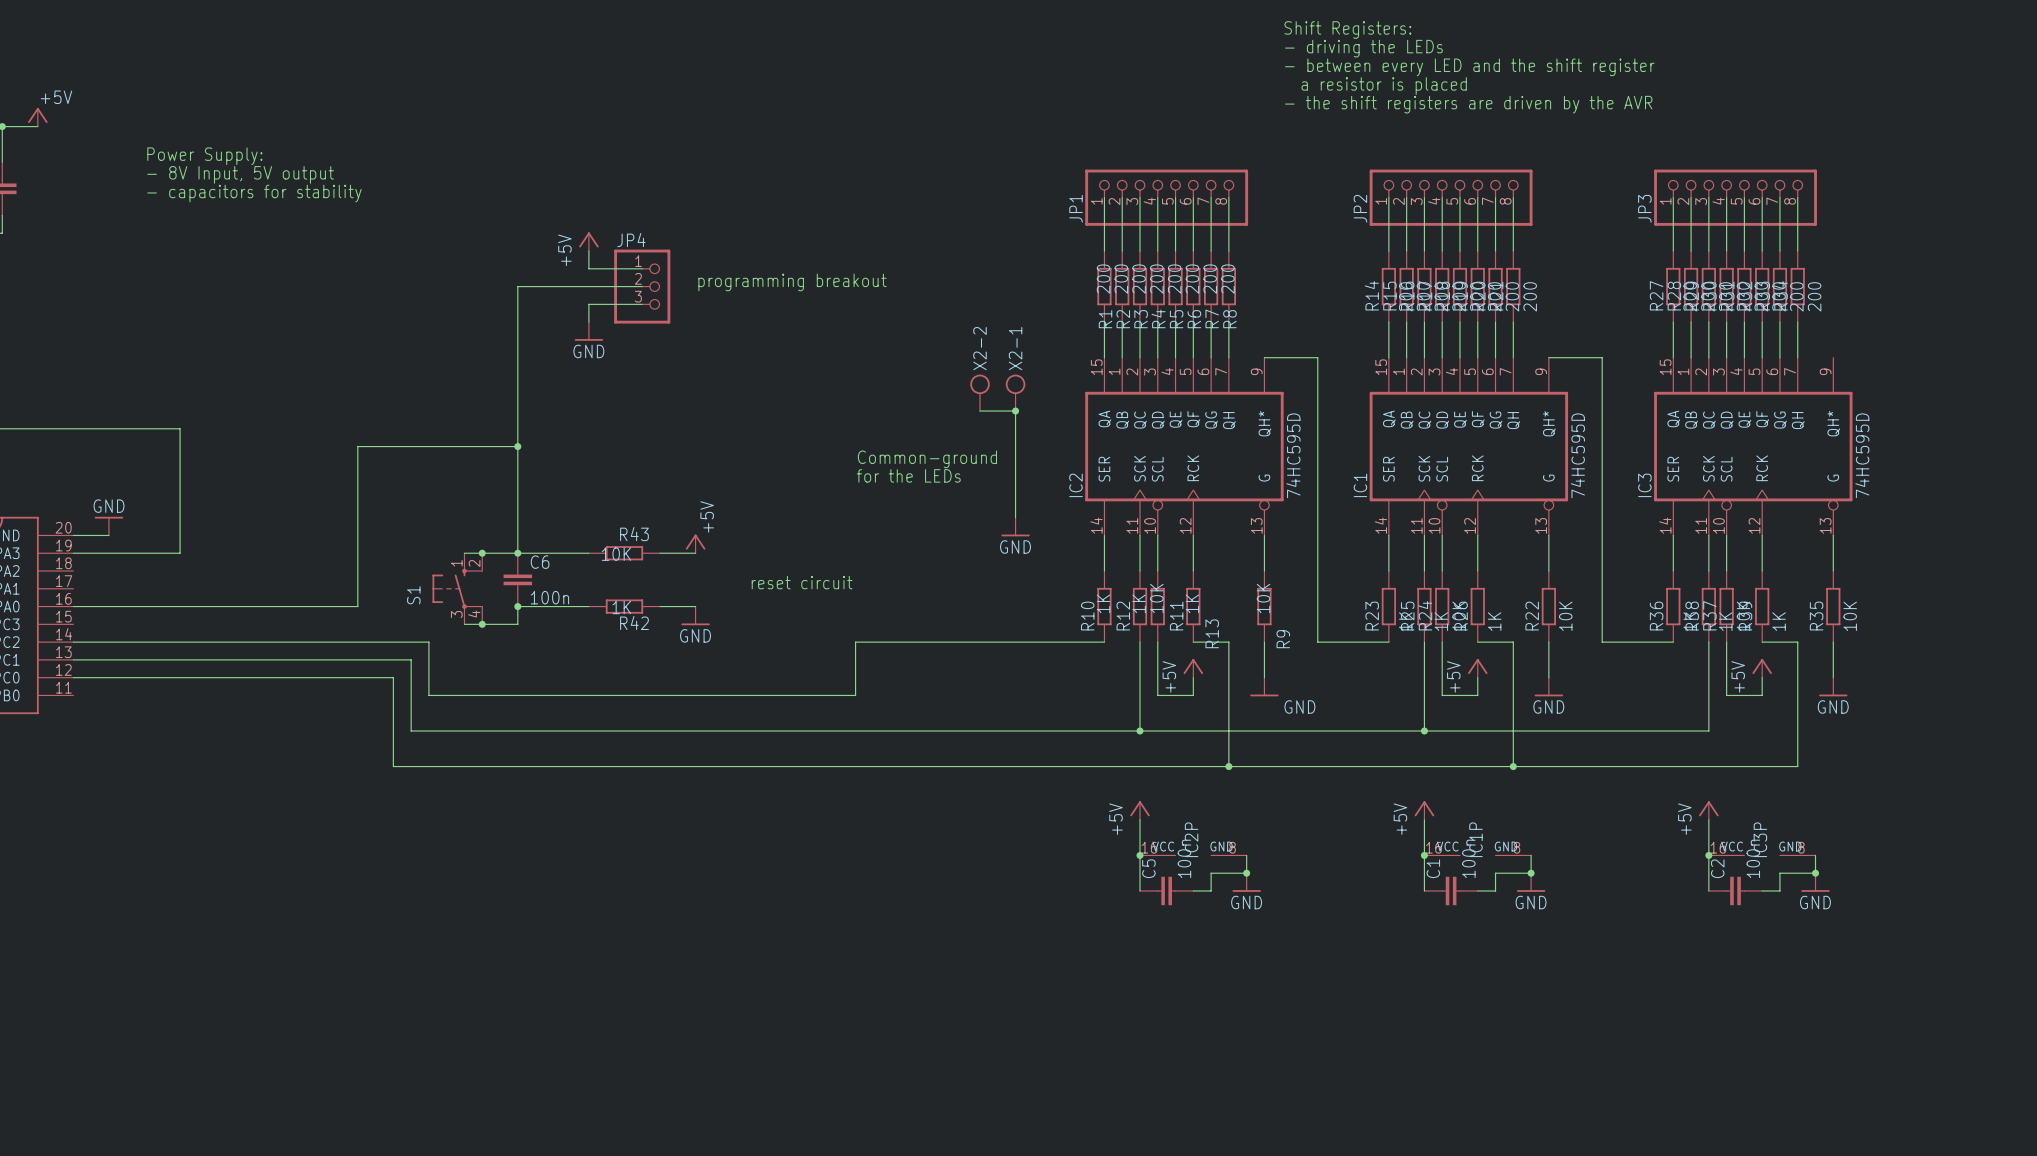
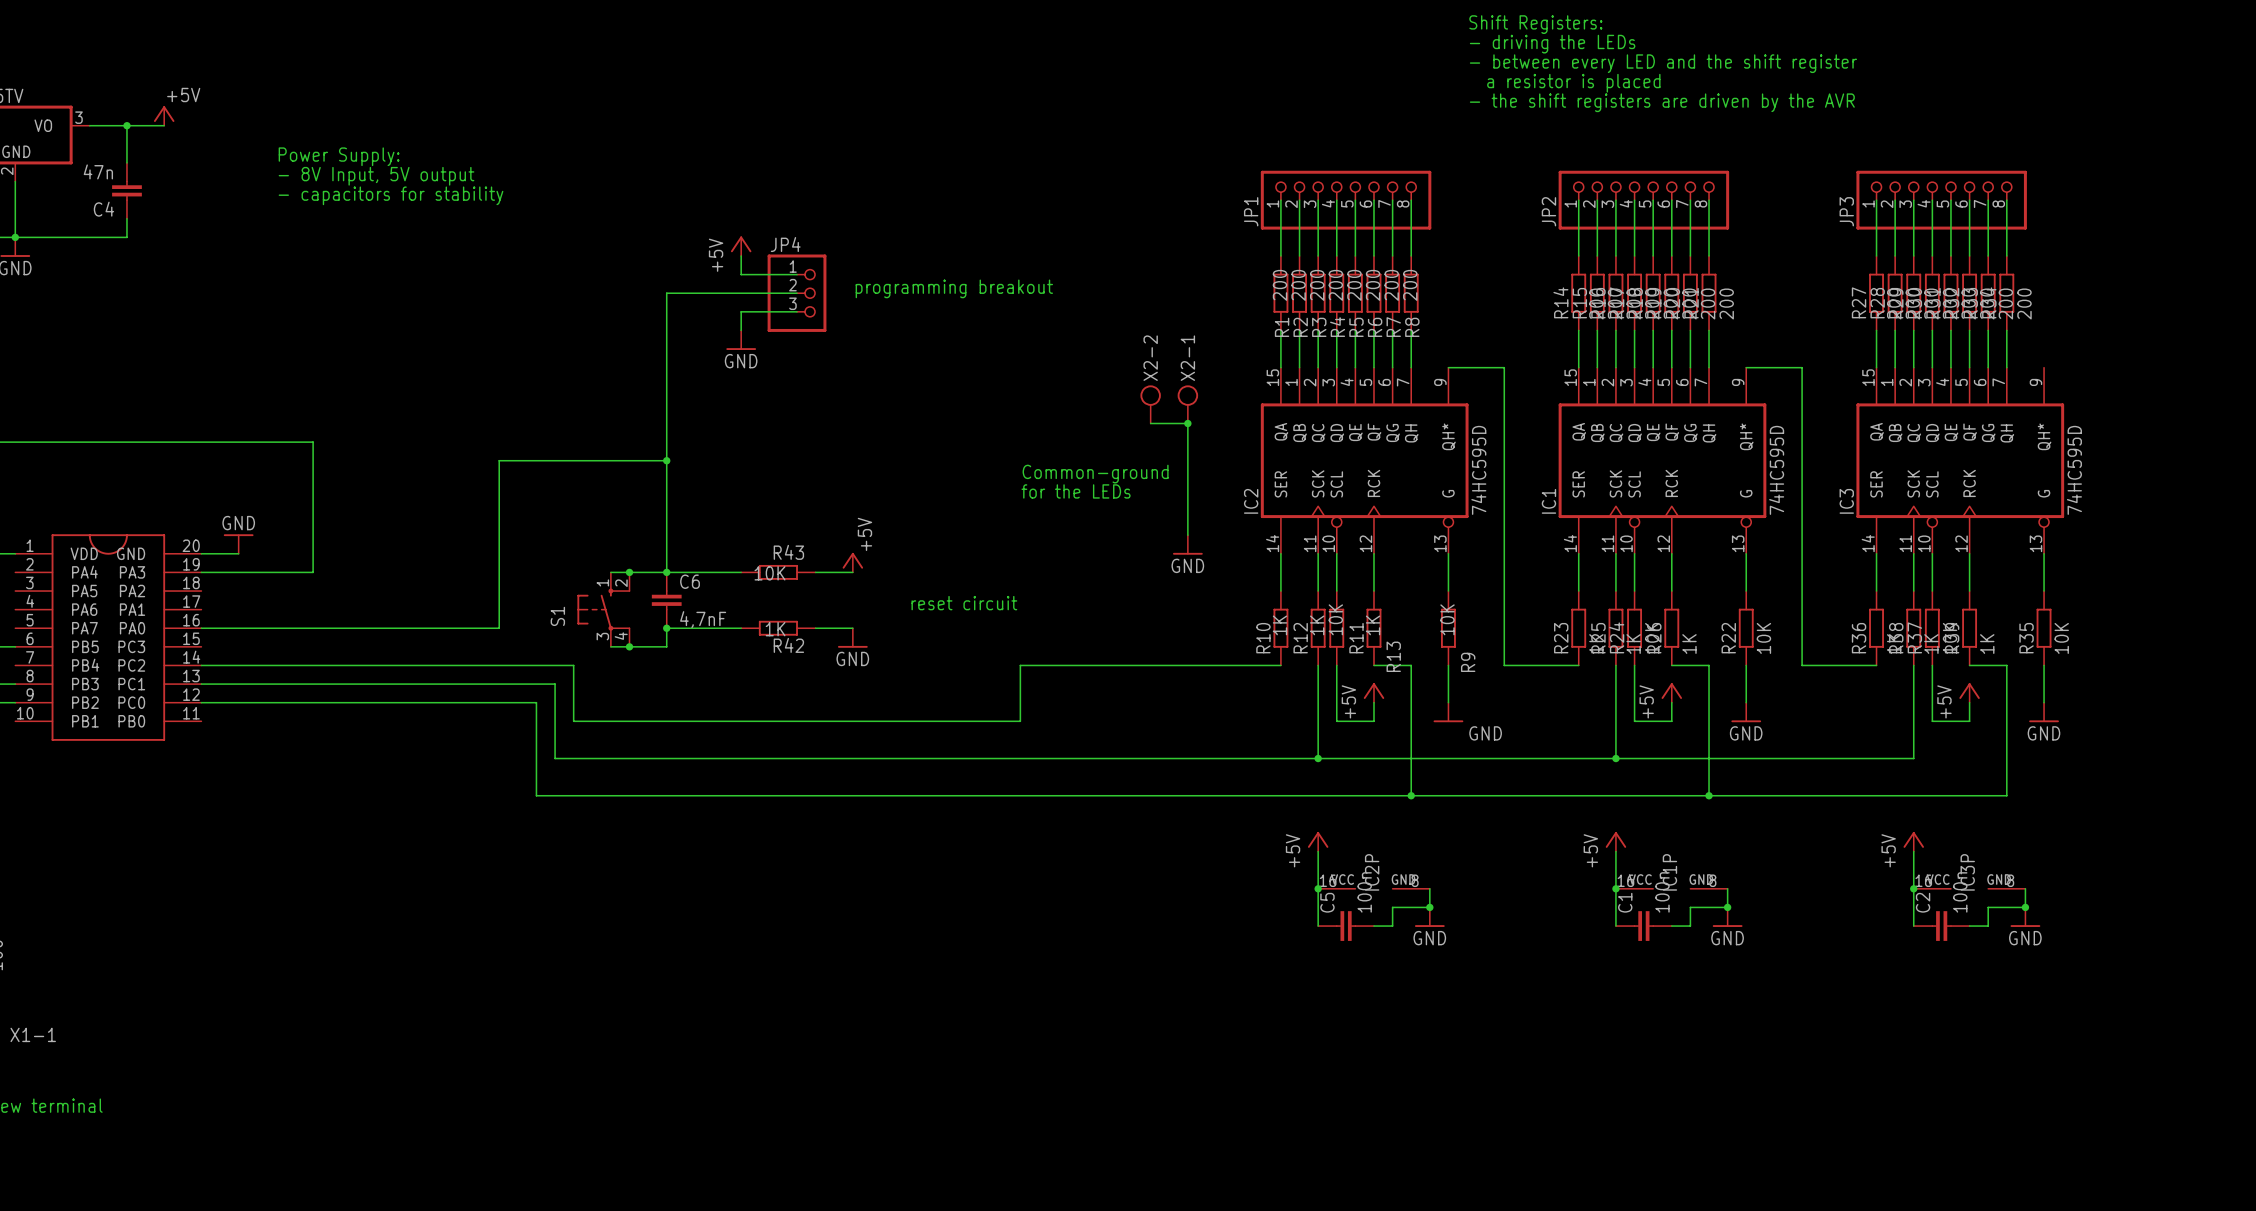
C6 value: 100n (549, 597) -> 4,7nF (703, 619)

